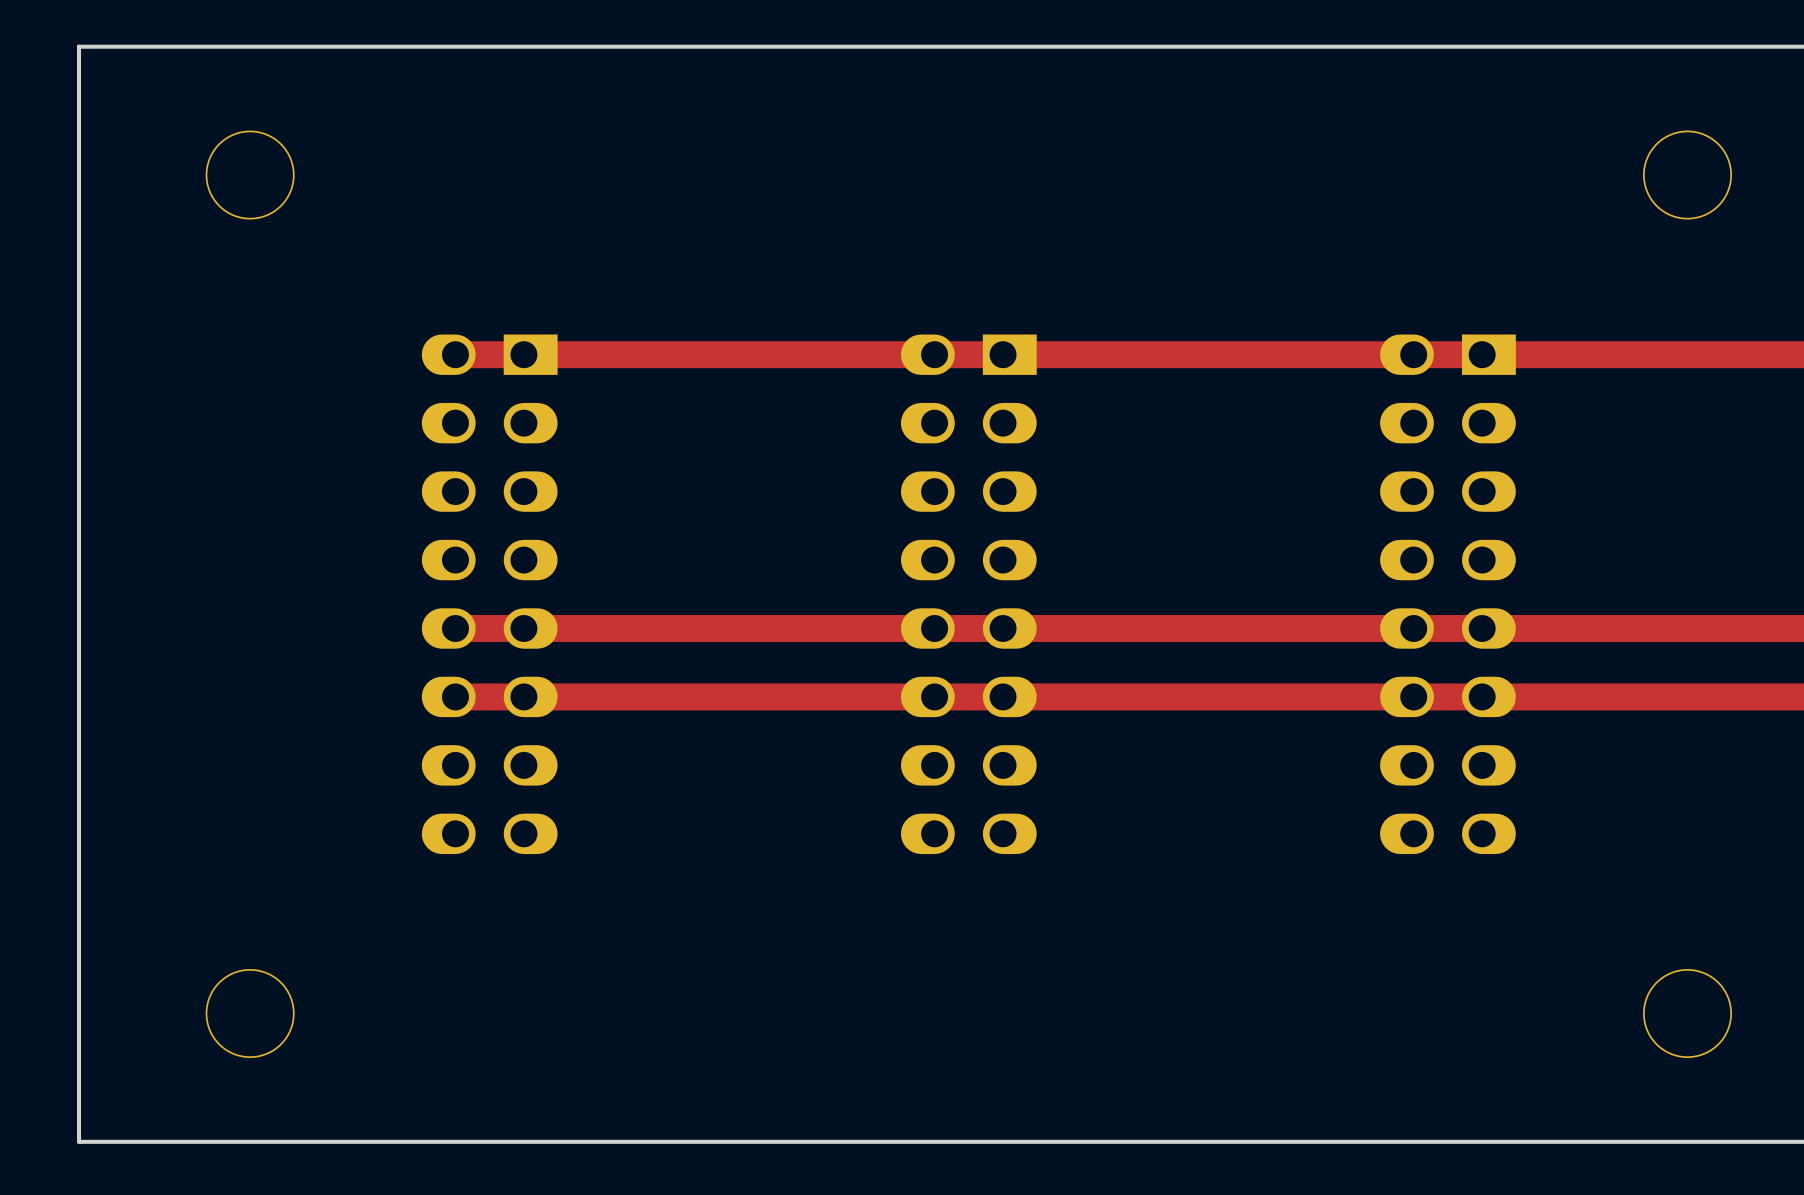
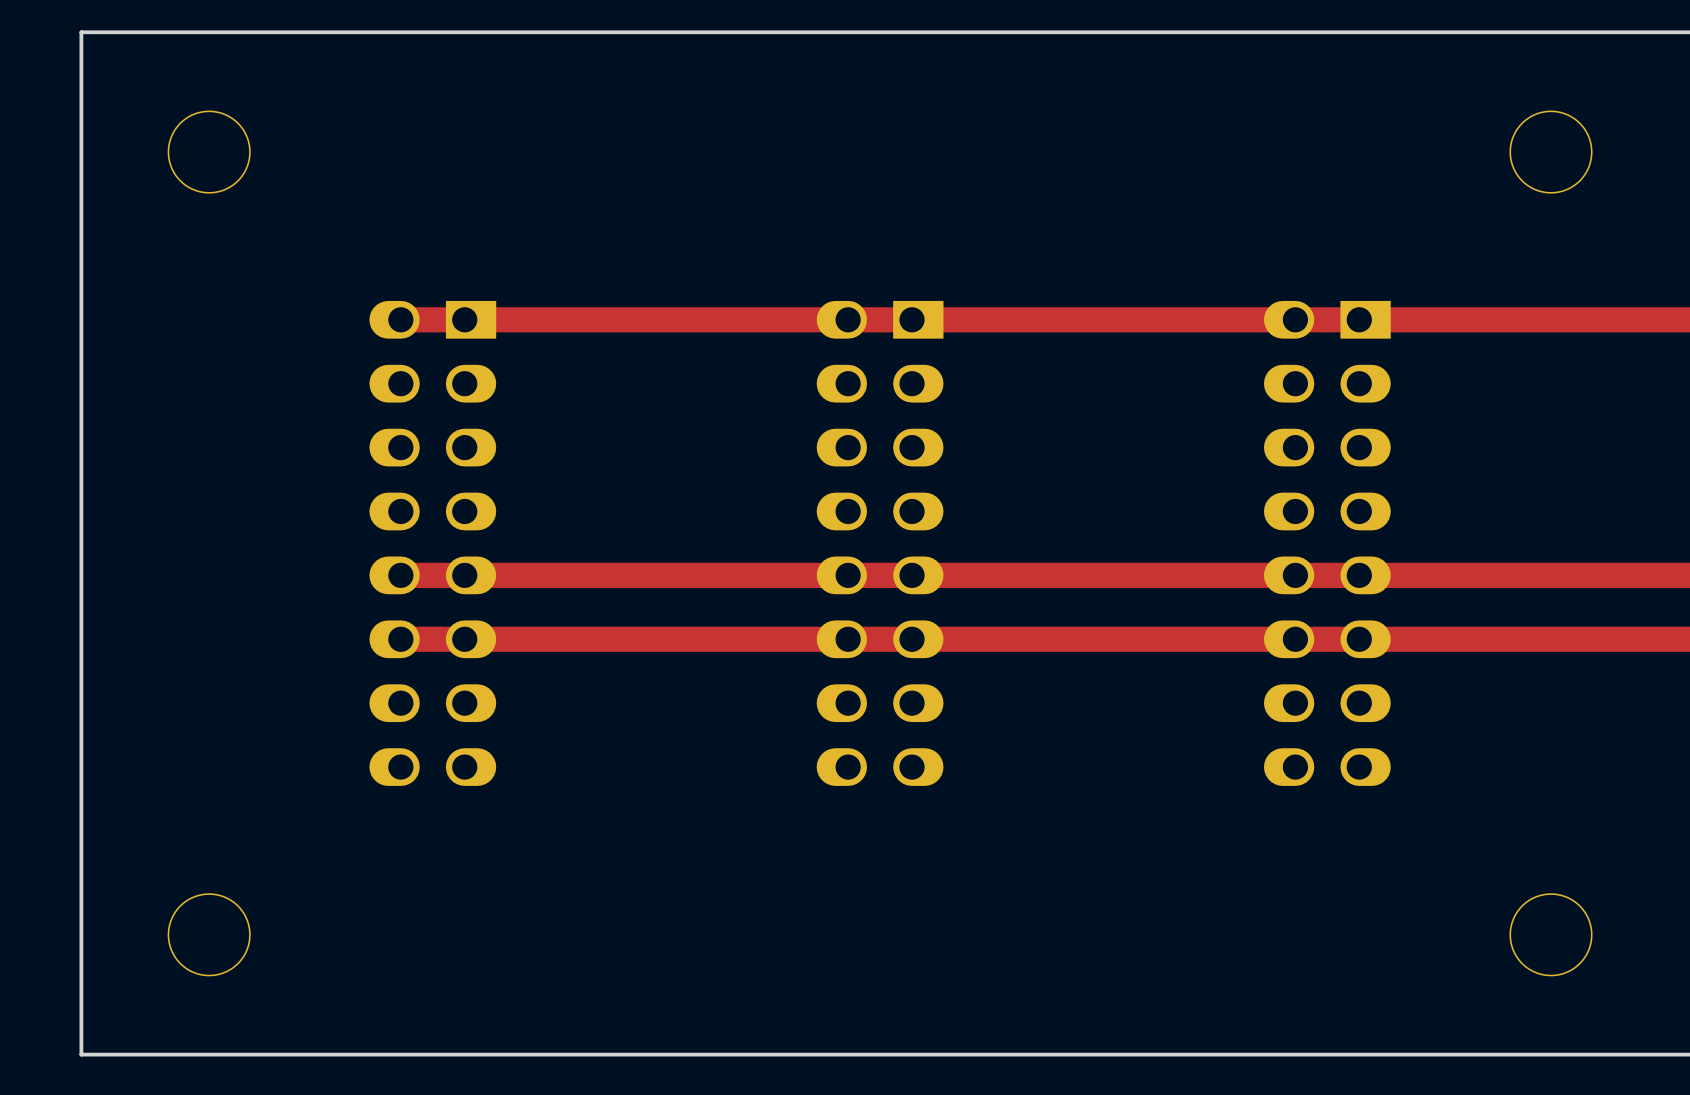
board edge: (113, 46) (79, 46) (79, 1141) (113, 1141) -> (81, 32) (81, 1054)

